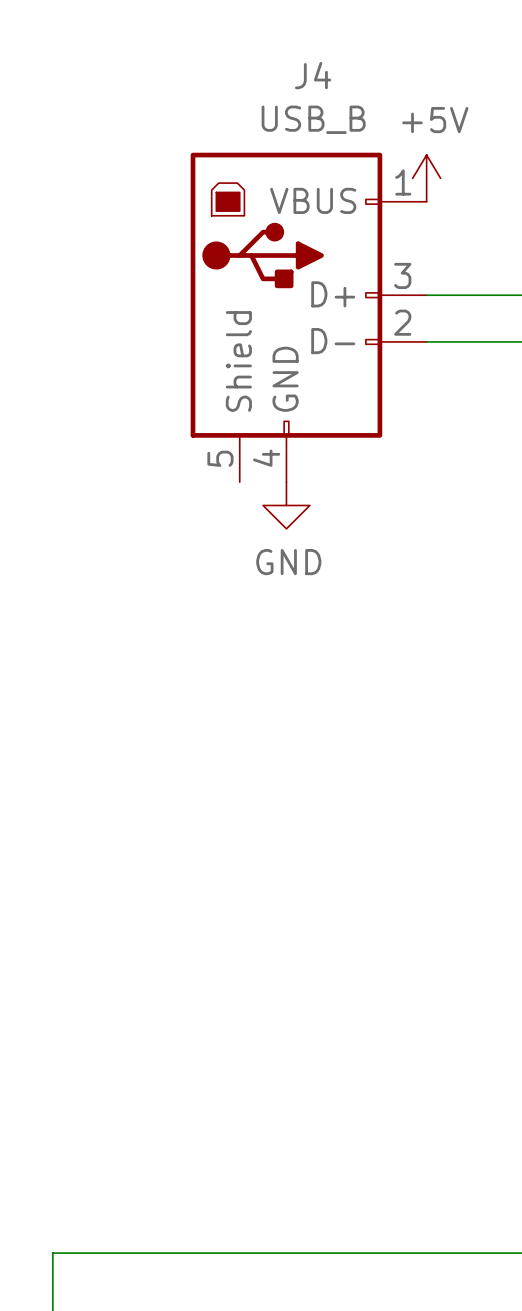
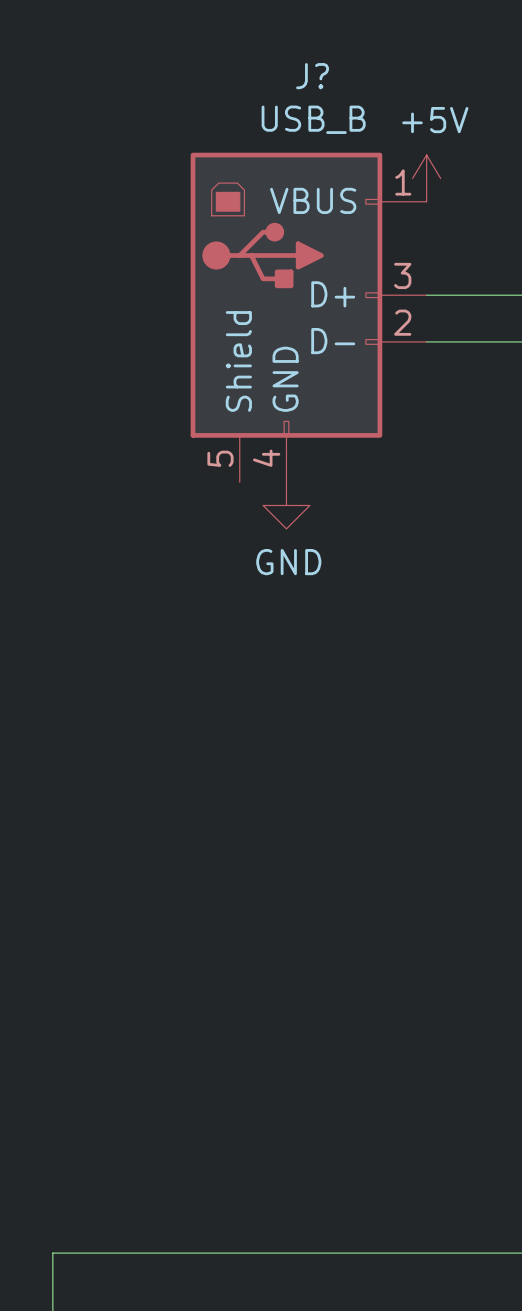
J4 name: J4 (313, 75) -> J? (312, 76)

